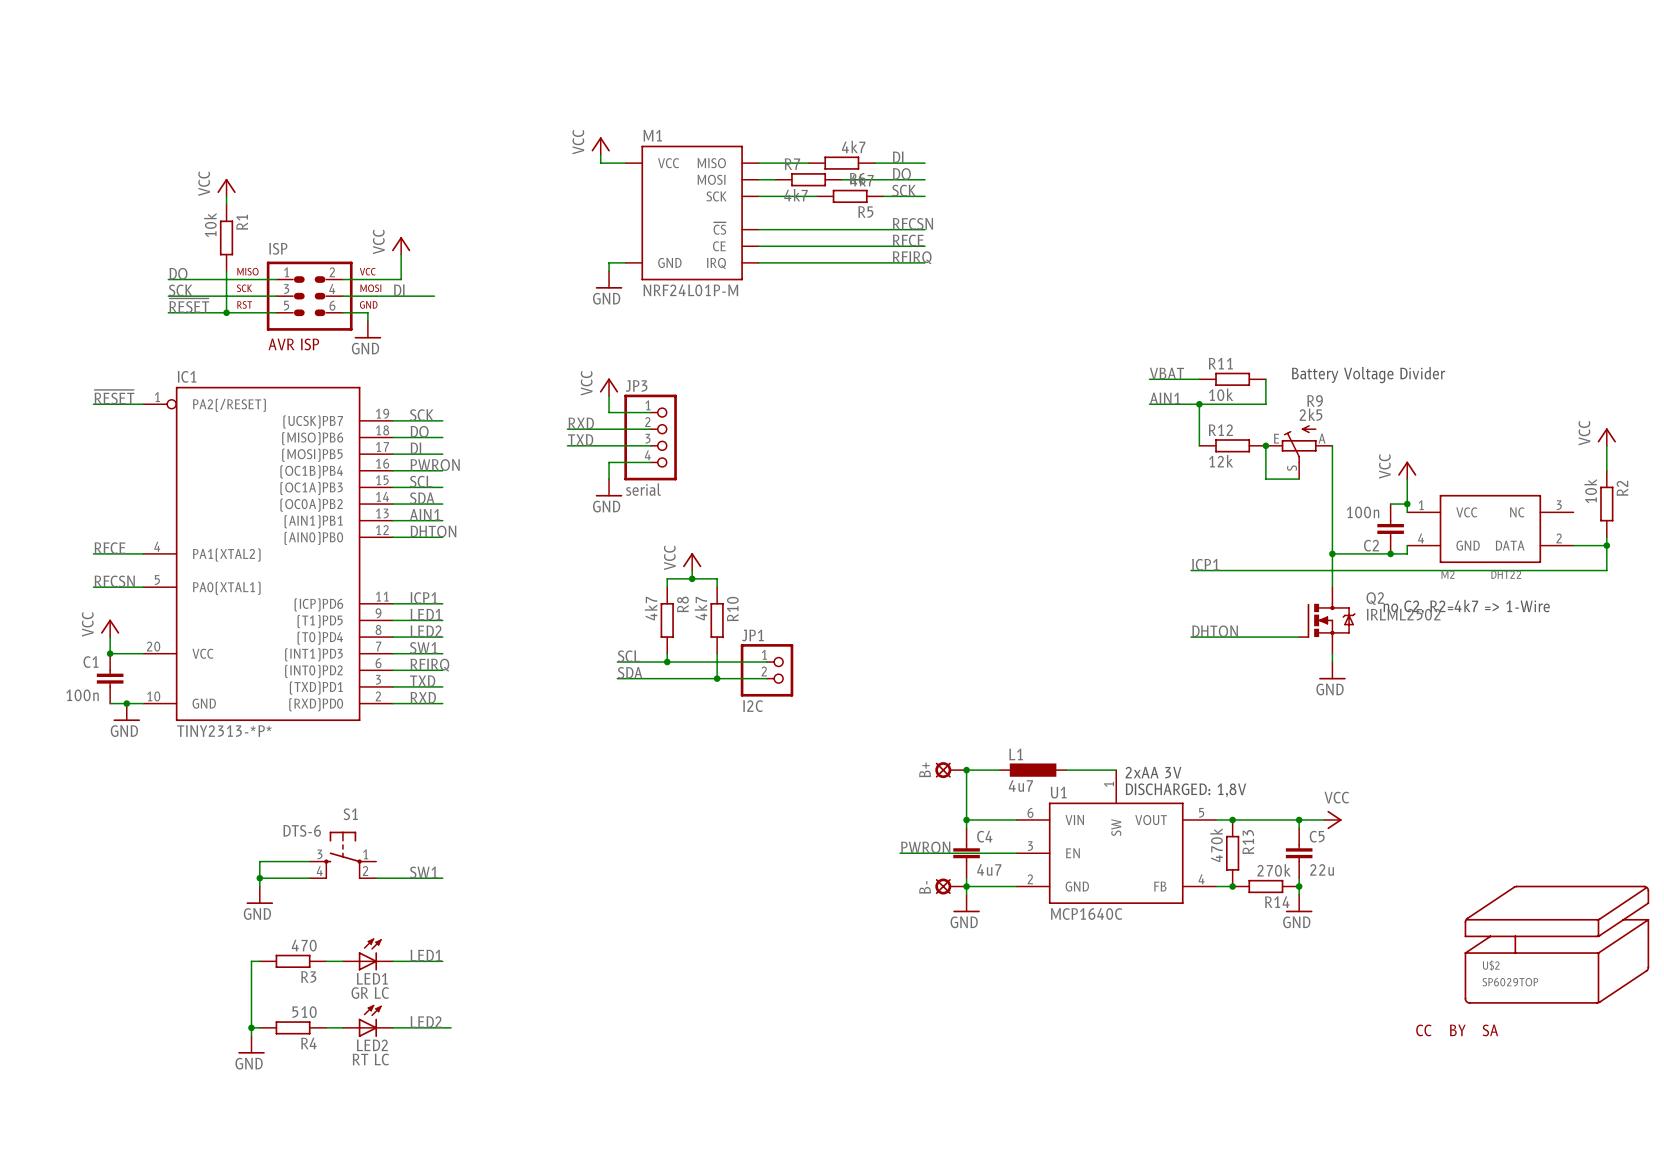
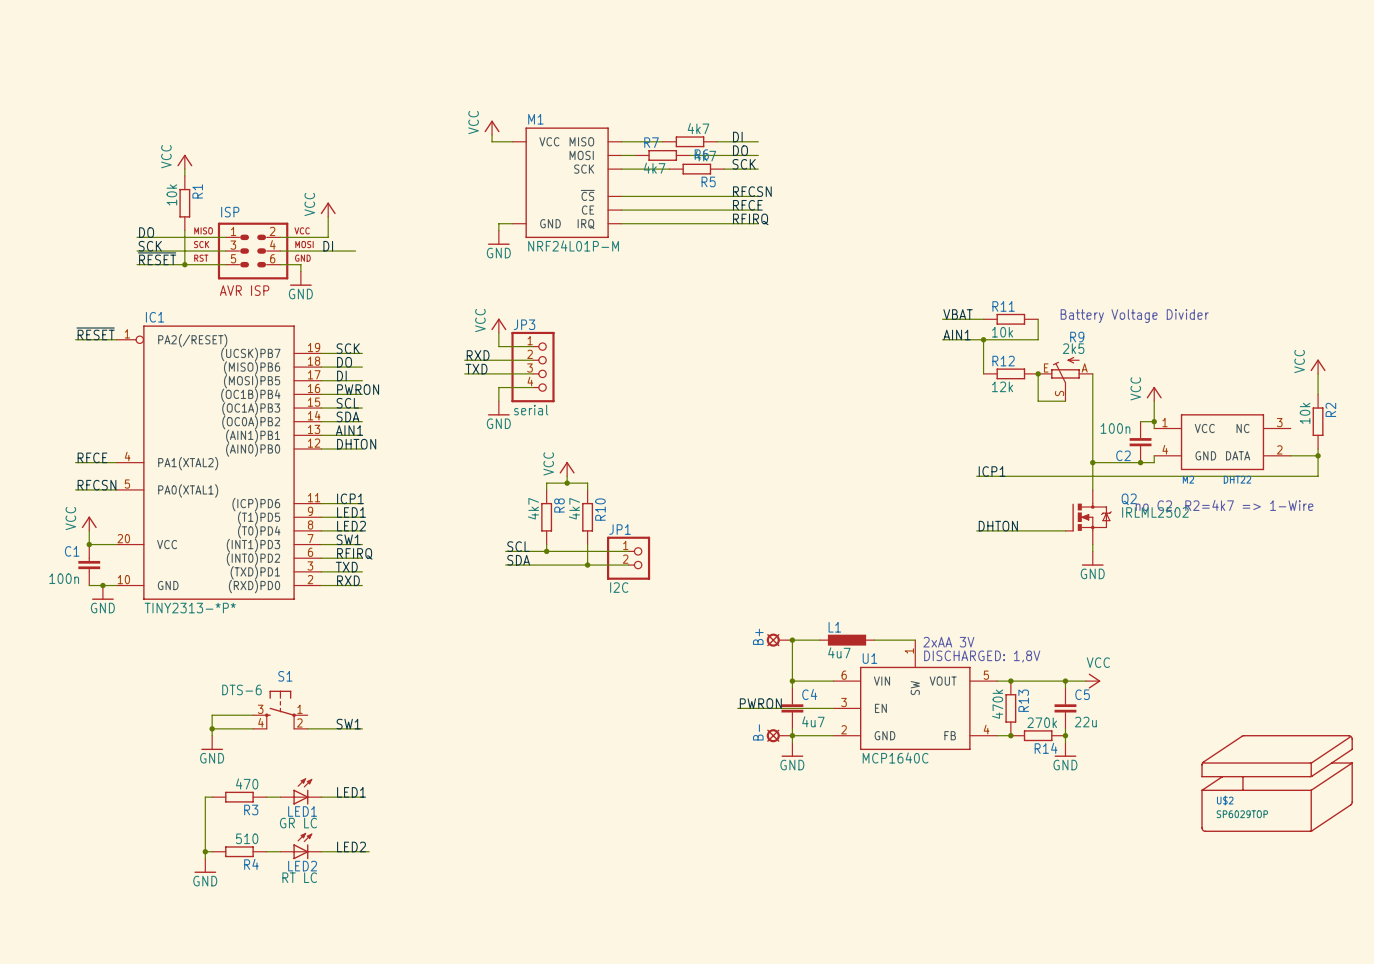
part: (1423, 1030) -> none
part: (1457, 1030) -> none
part: (1490, 1030) -> none

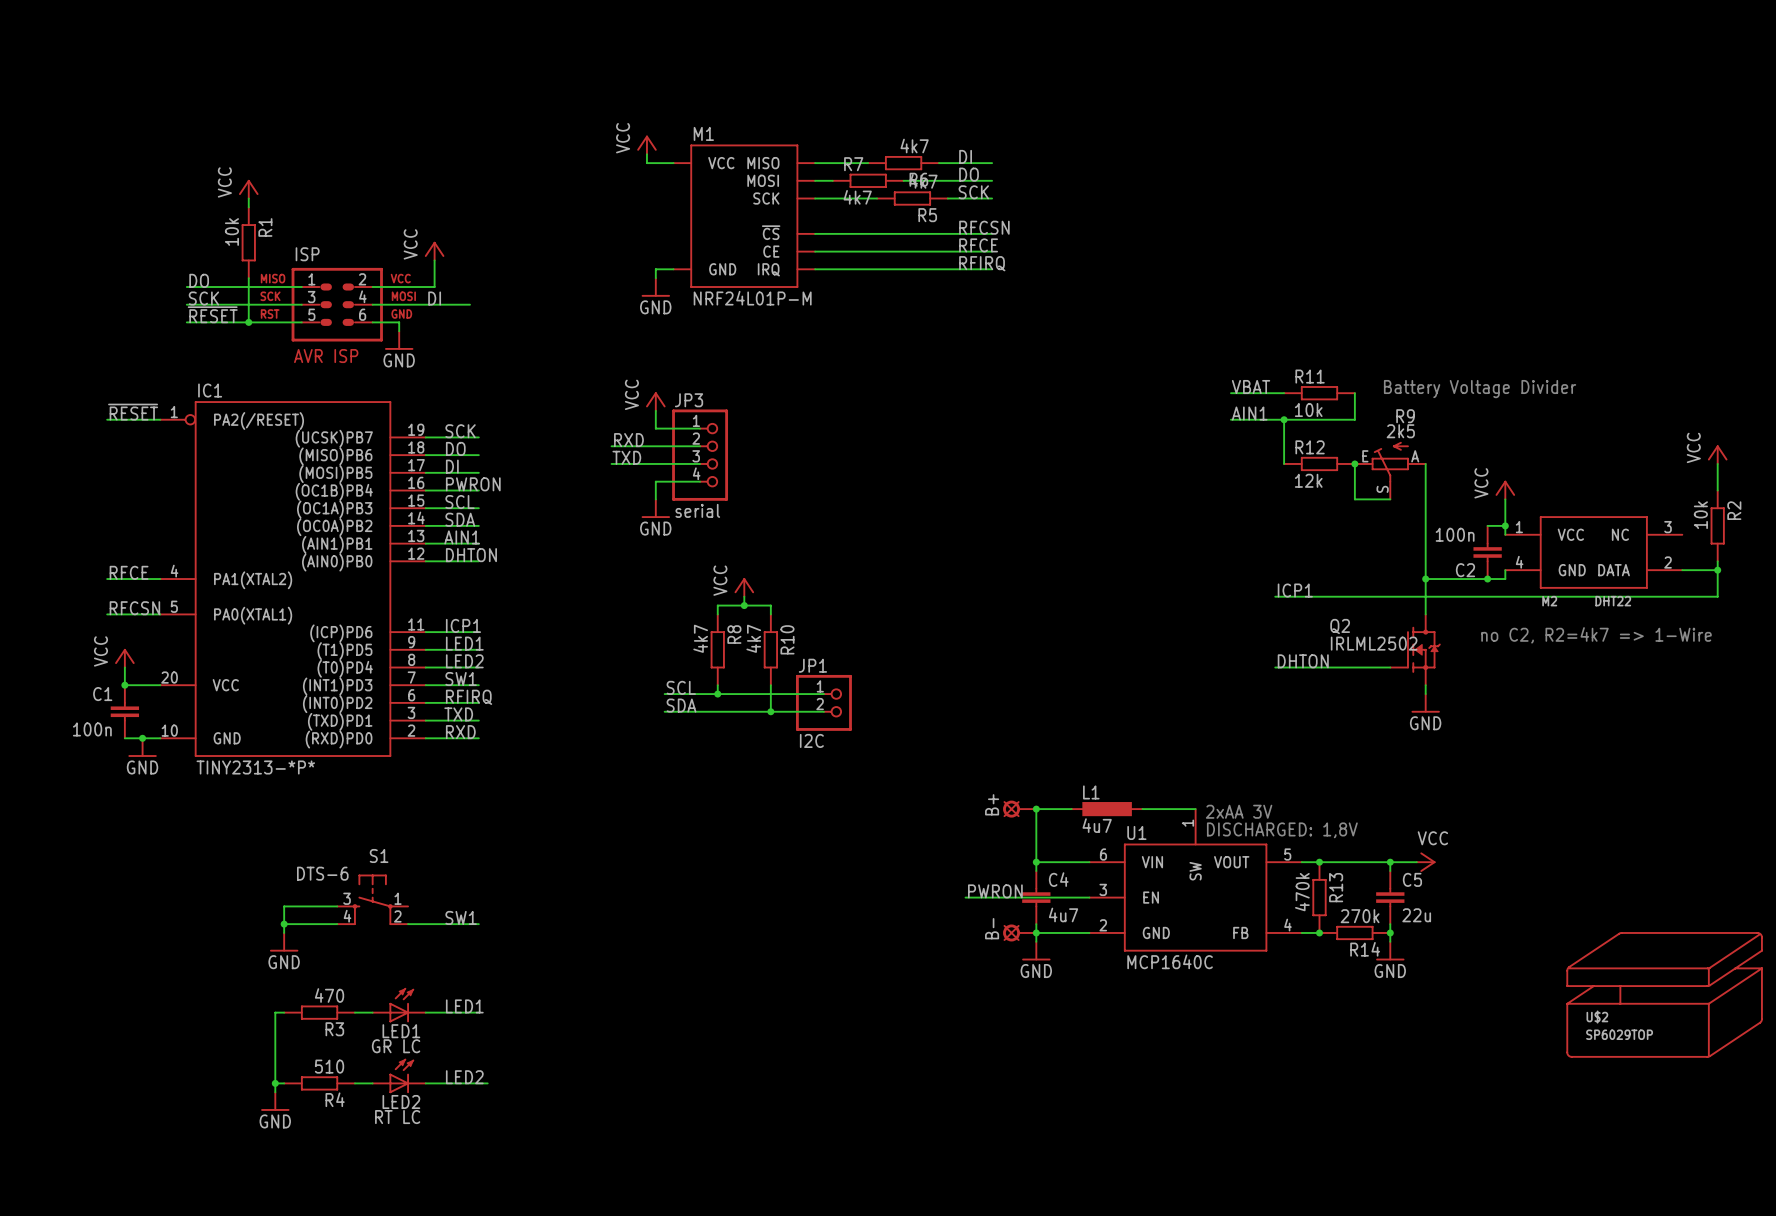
Q2 symbol: [1065, 489, 1112, 545] -> [1390, 614, 1441, 686]
Q2 name position: Q2 (1129, 499) -> Q2 (1340, 626)
Q2 value position: IRLML2502 (1155, 512) -> IRLML2502 (1374, 643)

